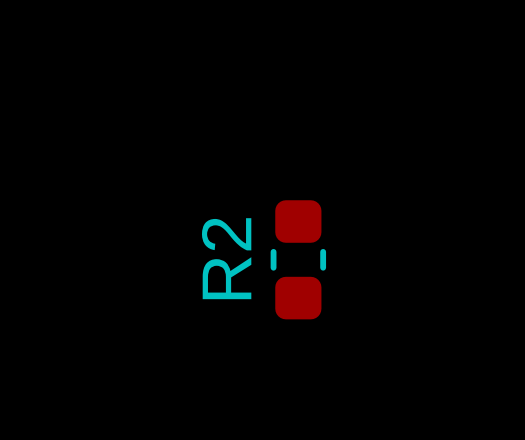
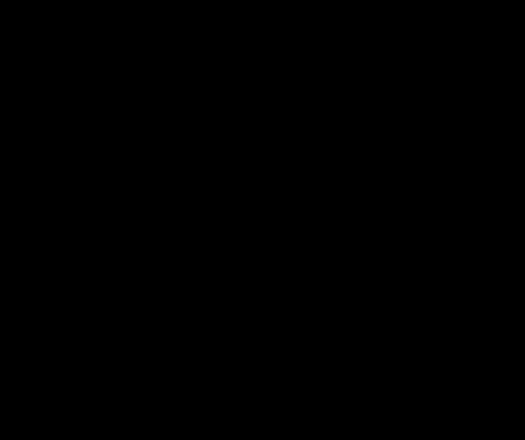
R2: (298, 259) -> none

